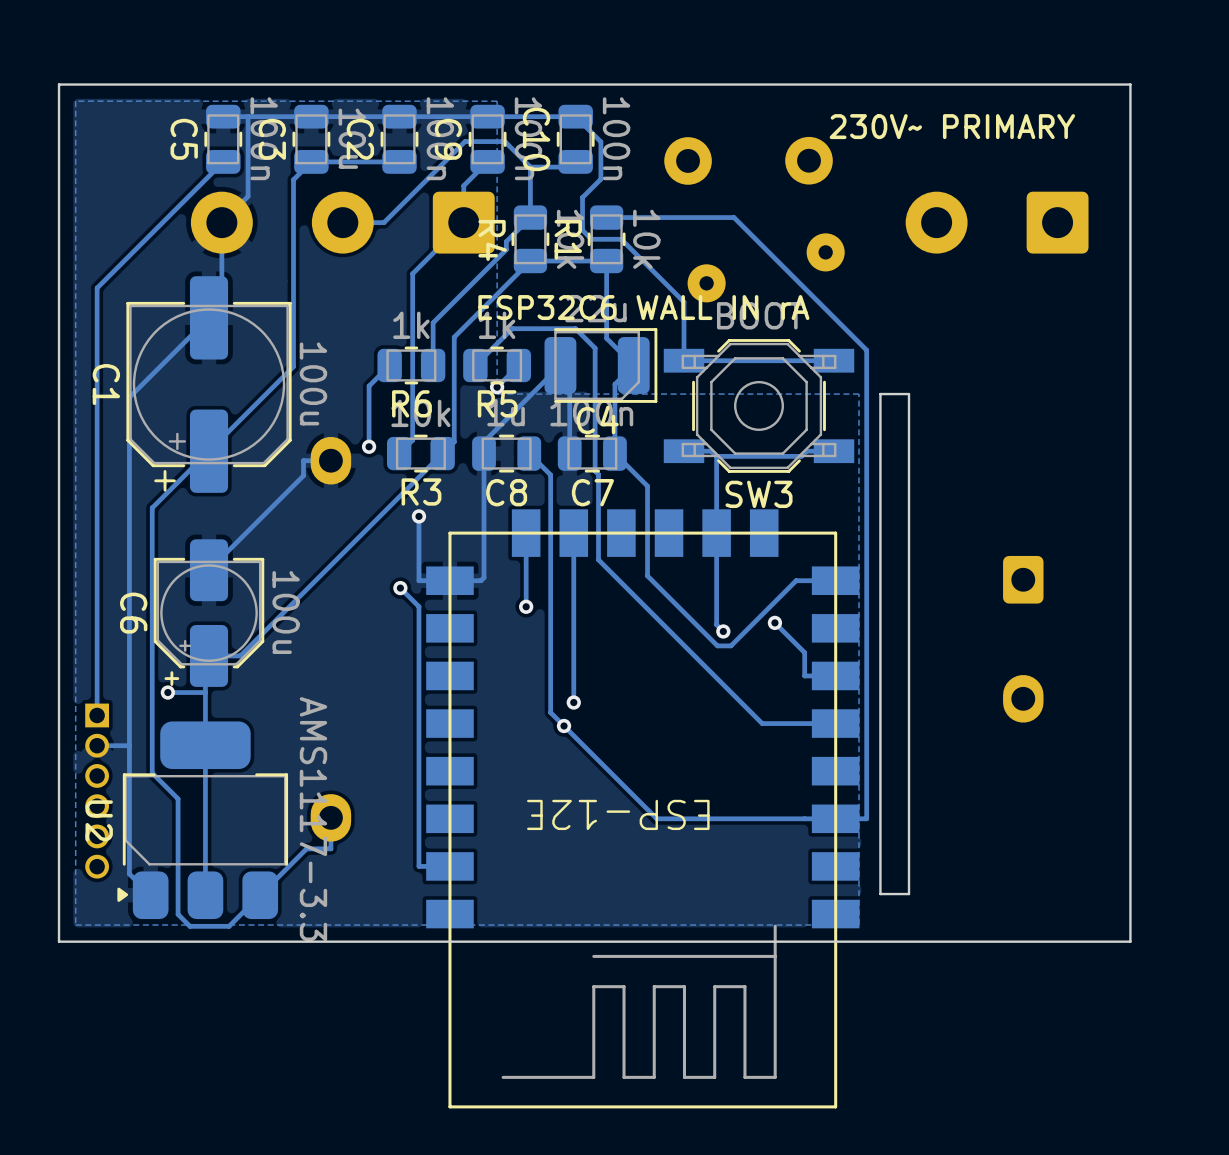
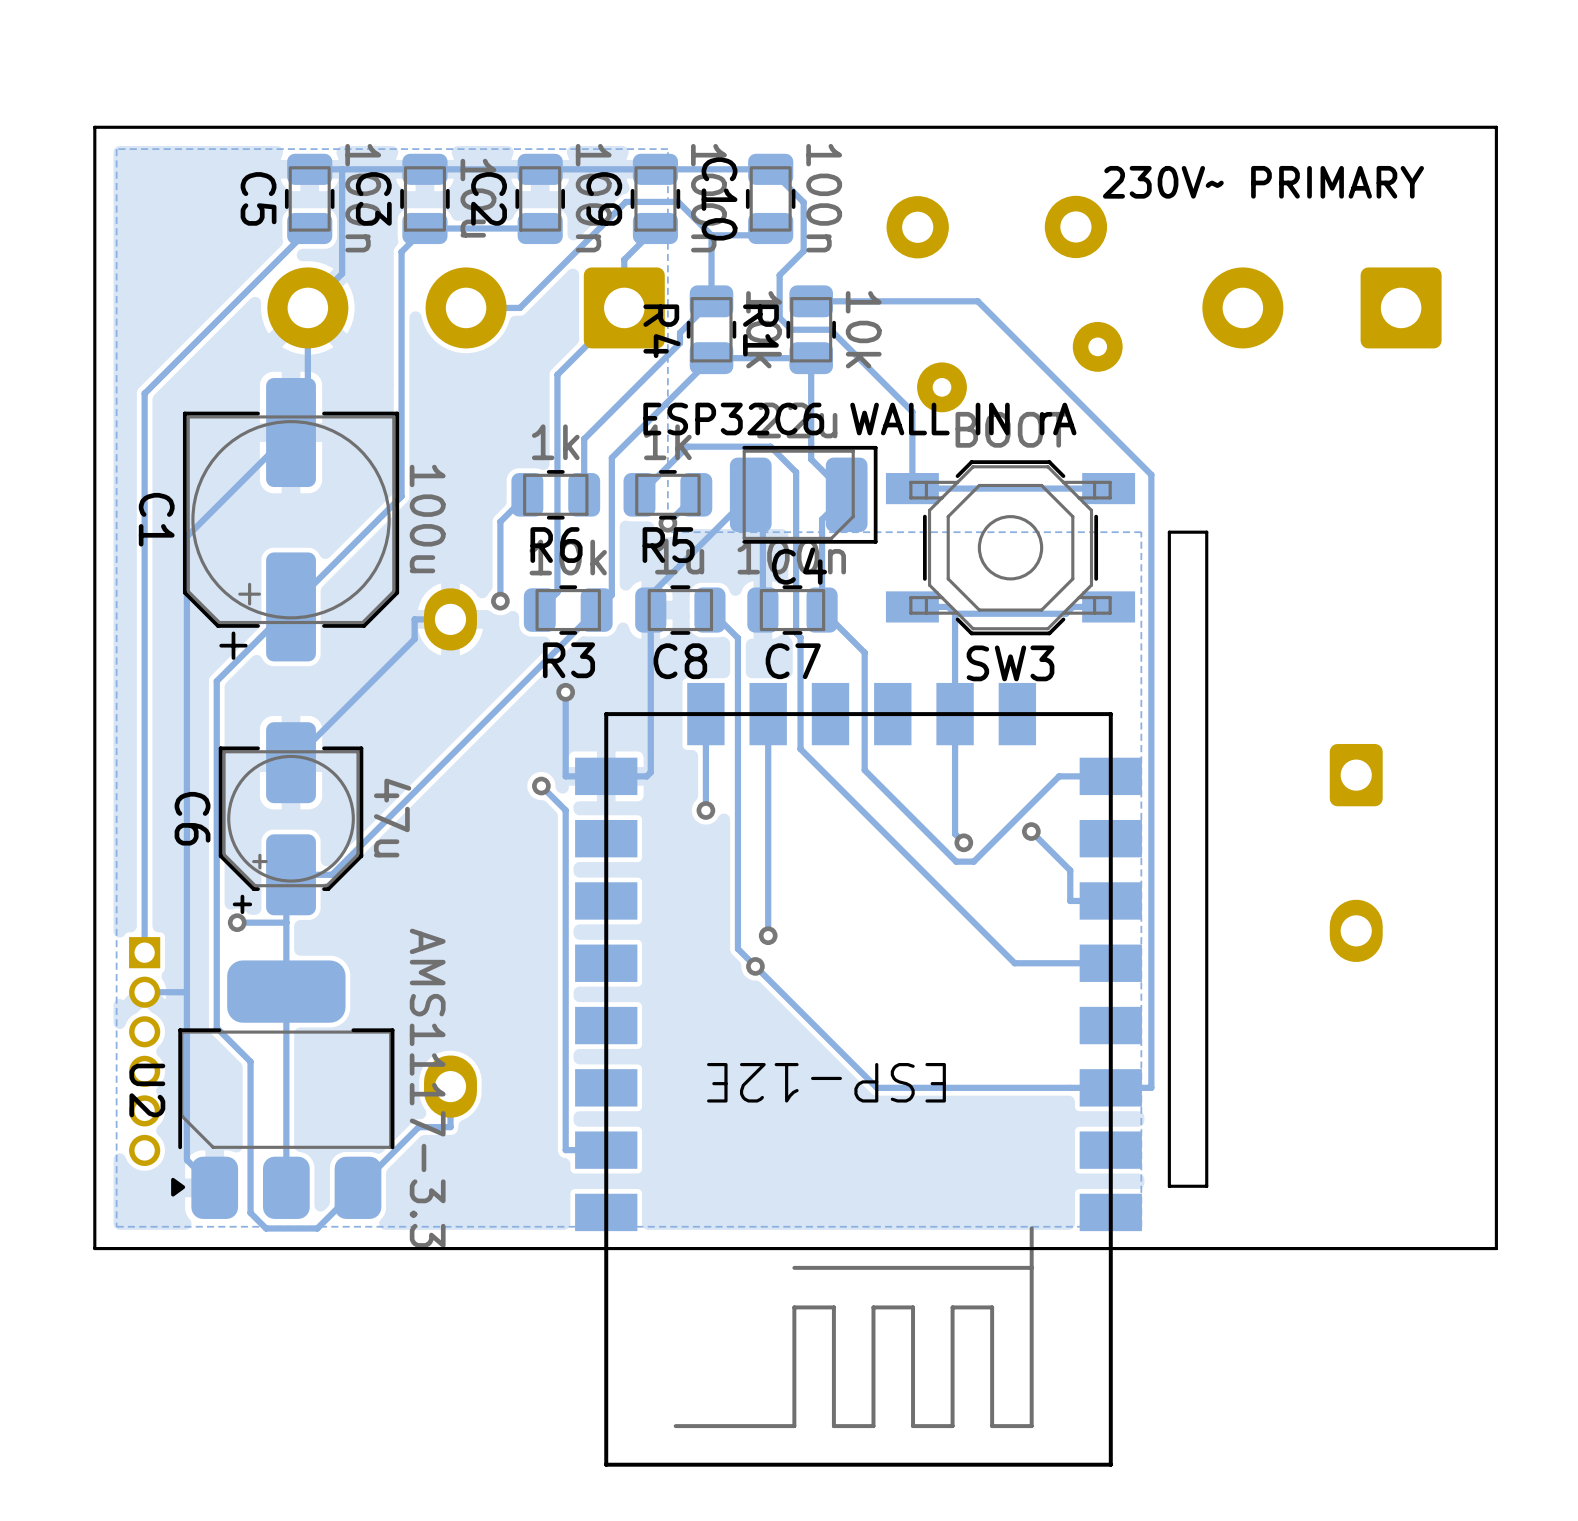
C6 value: 100u (286, 612) -> 47u (392, 817)

